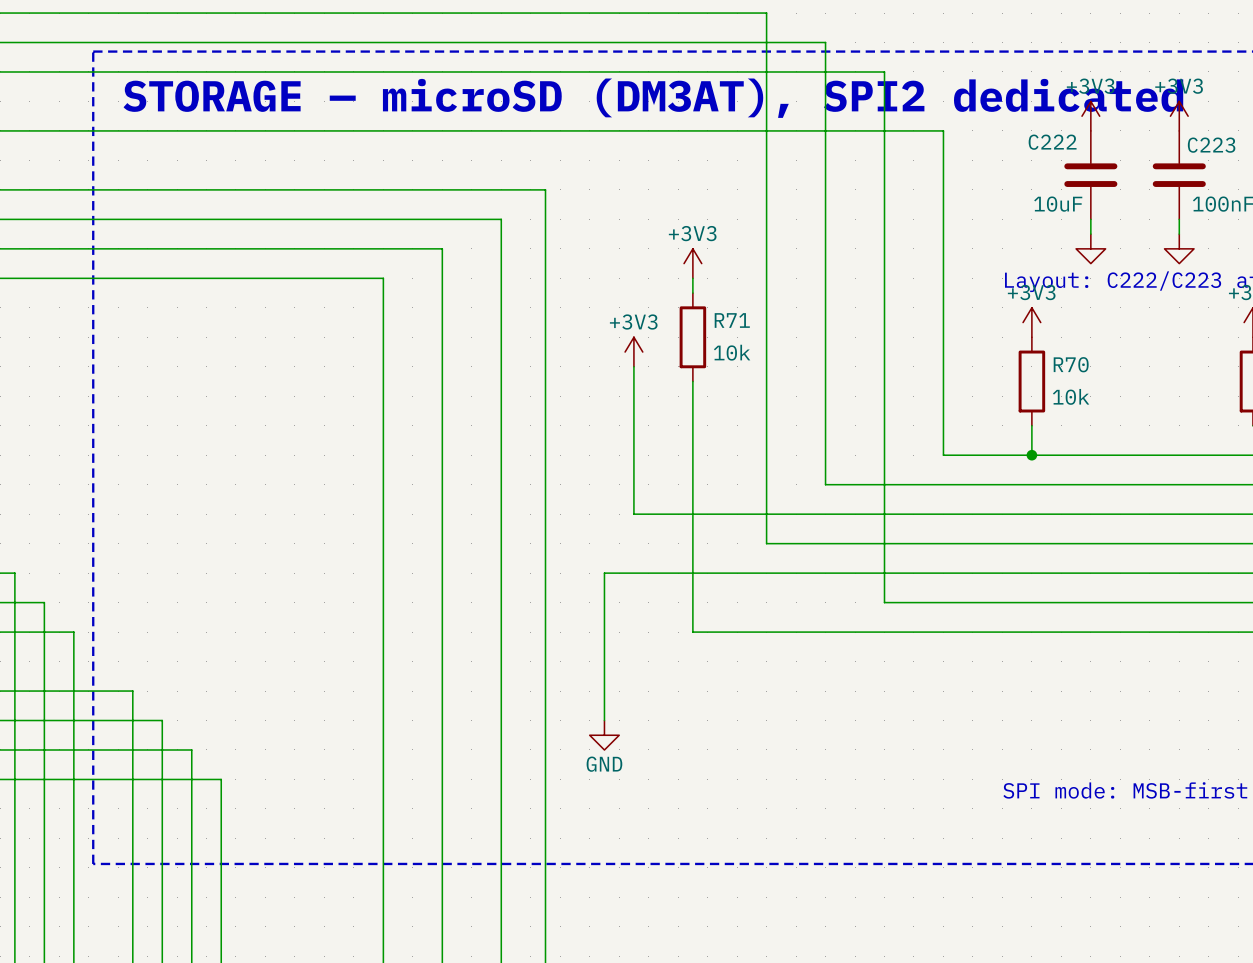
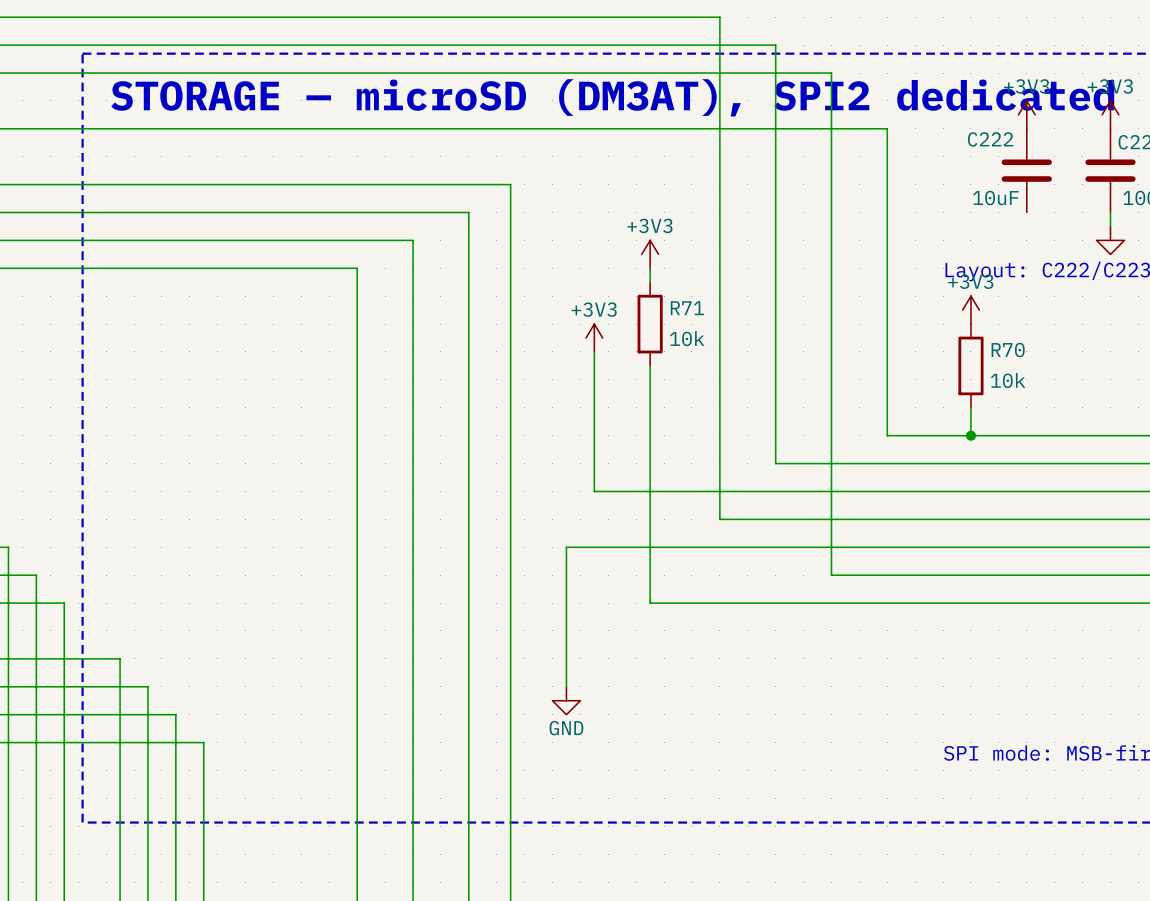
wire: (1090, 219) (1090, 234) -> none
power symbol: (1090, 248) -> none

